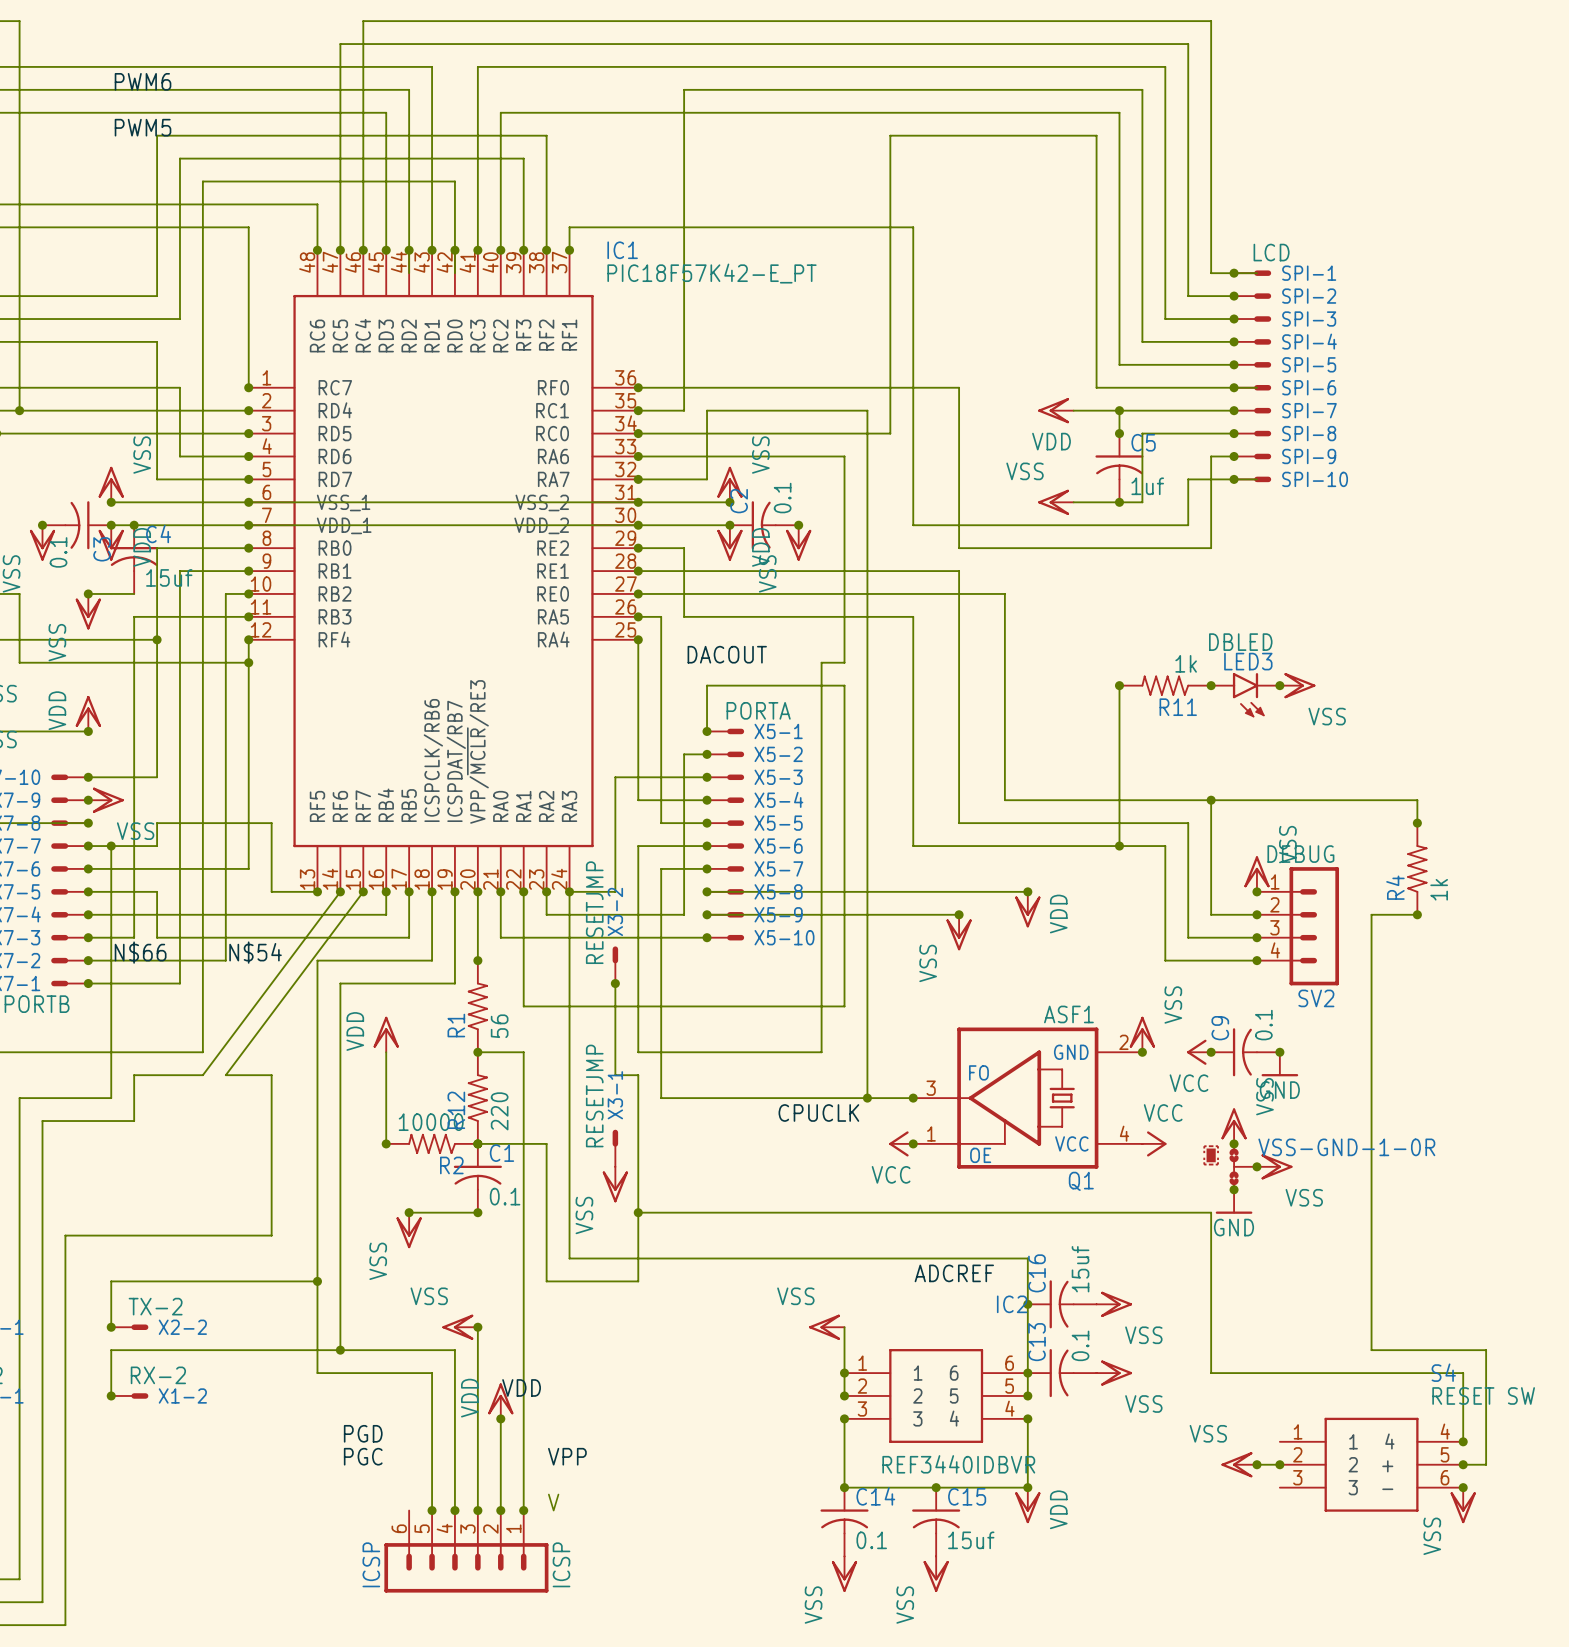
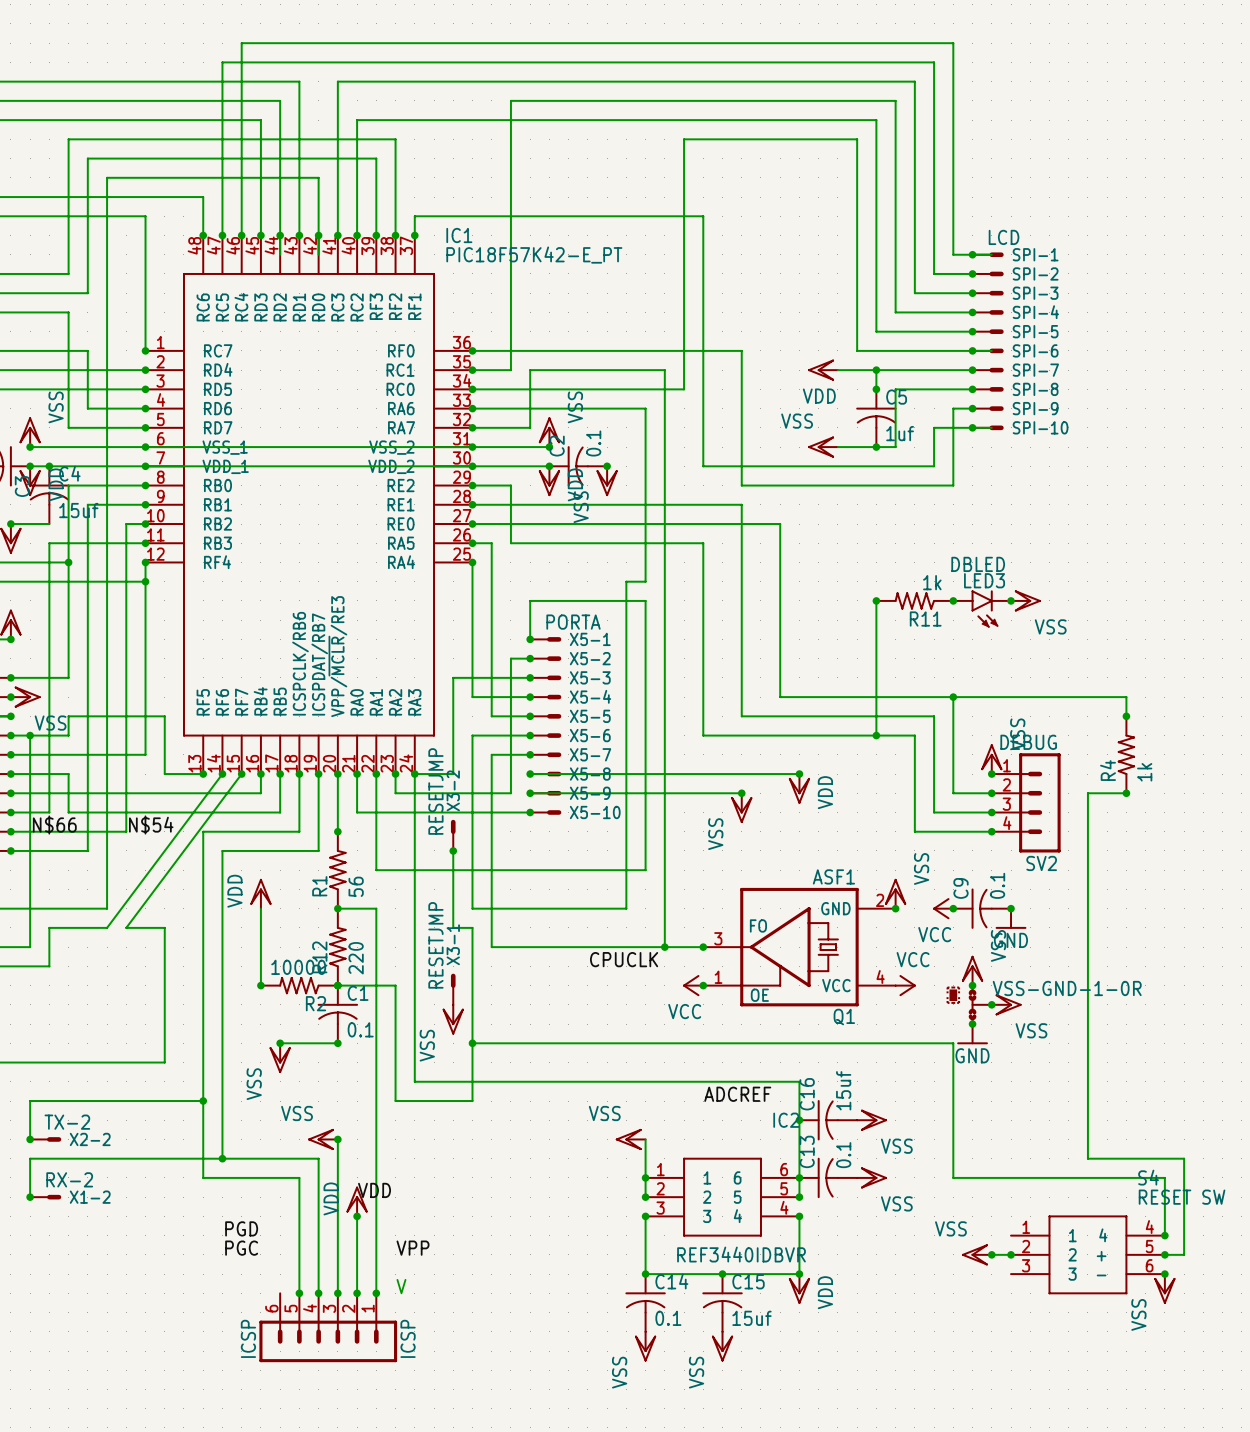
label: PWM6 (143, 81) -> none
label: PWM5 (143, 127) -> none
label: DACOUT (727, 654) -> none

